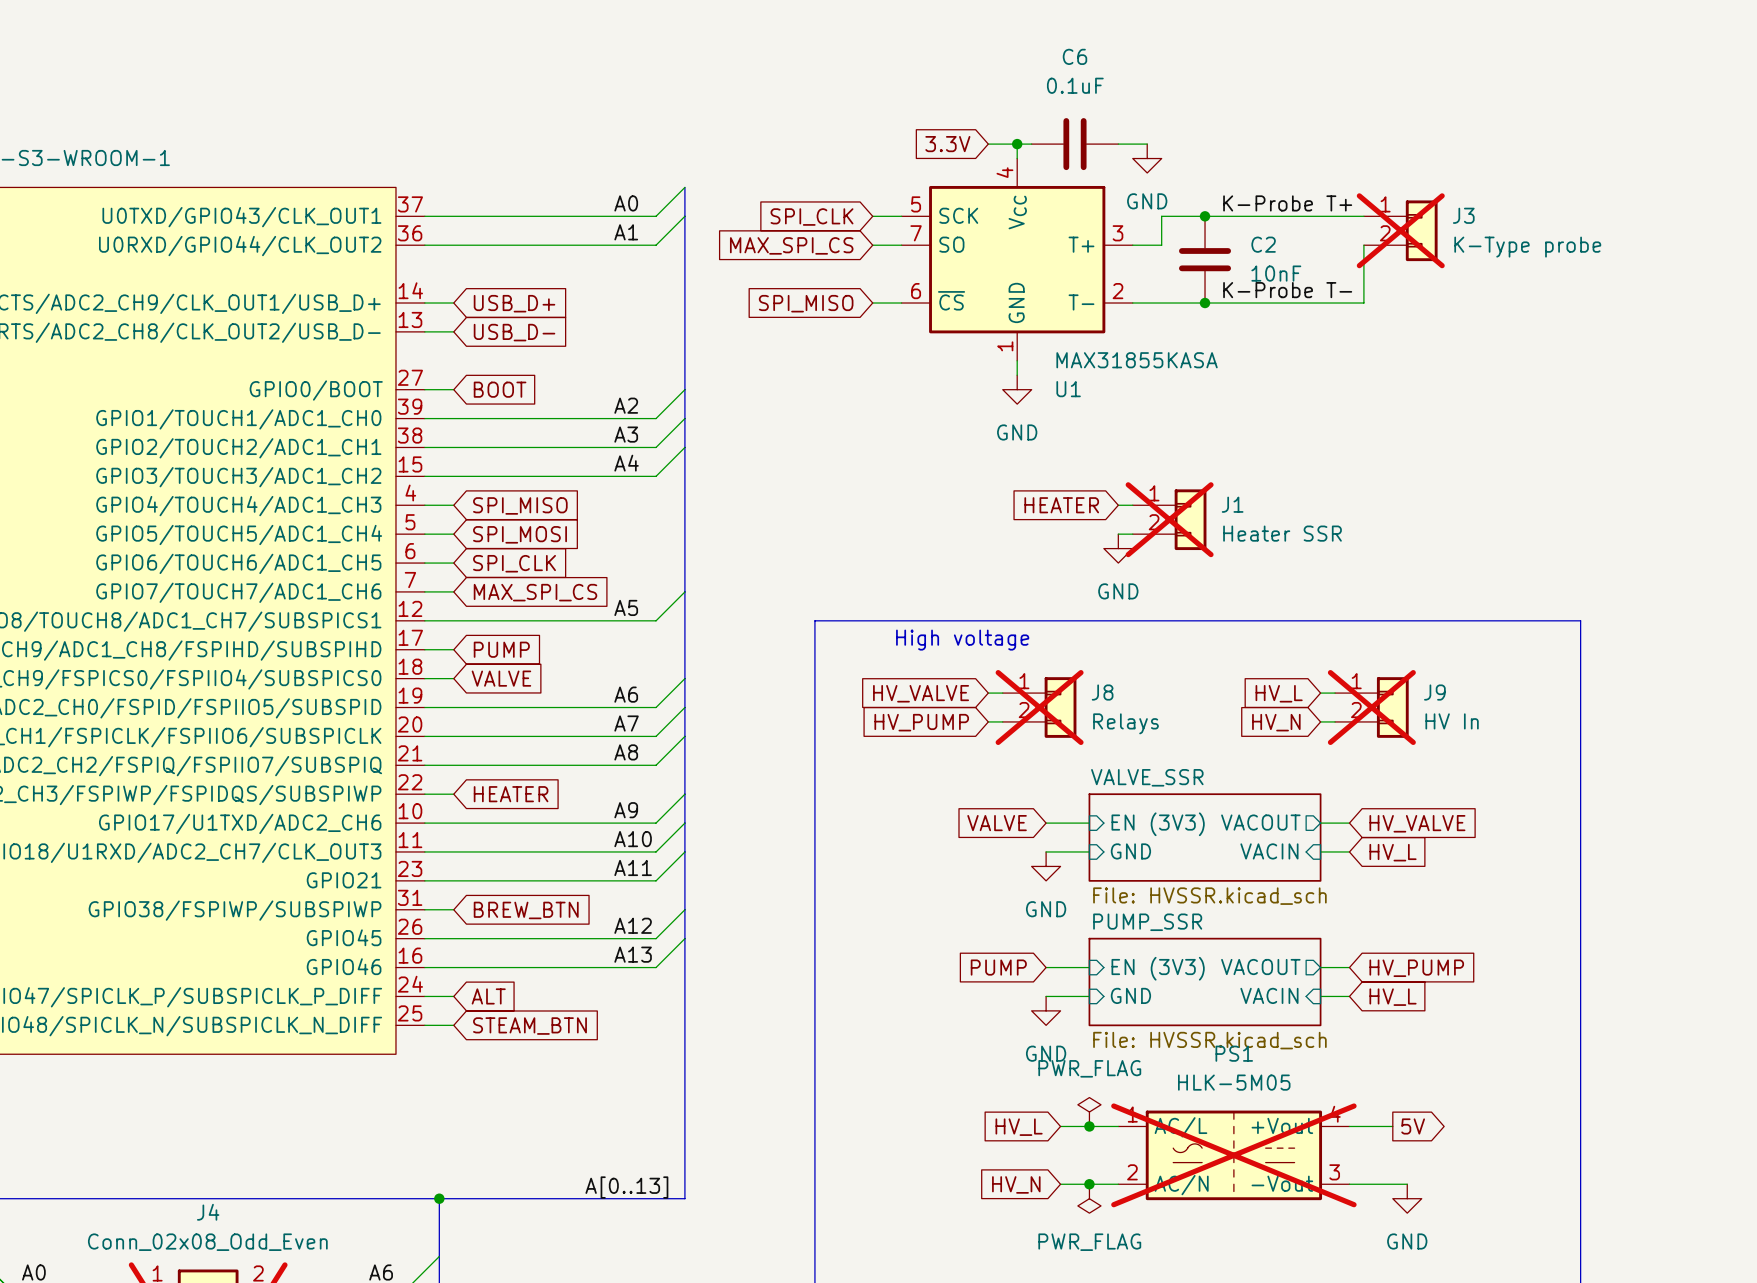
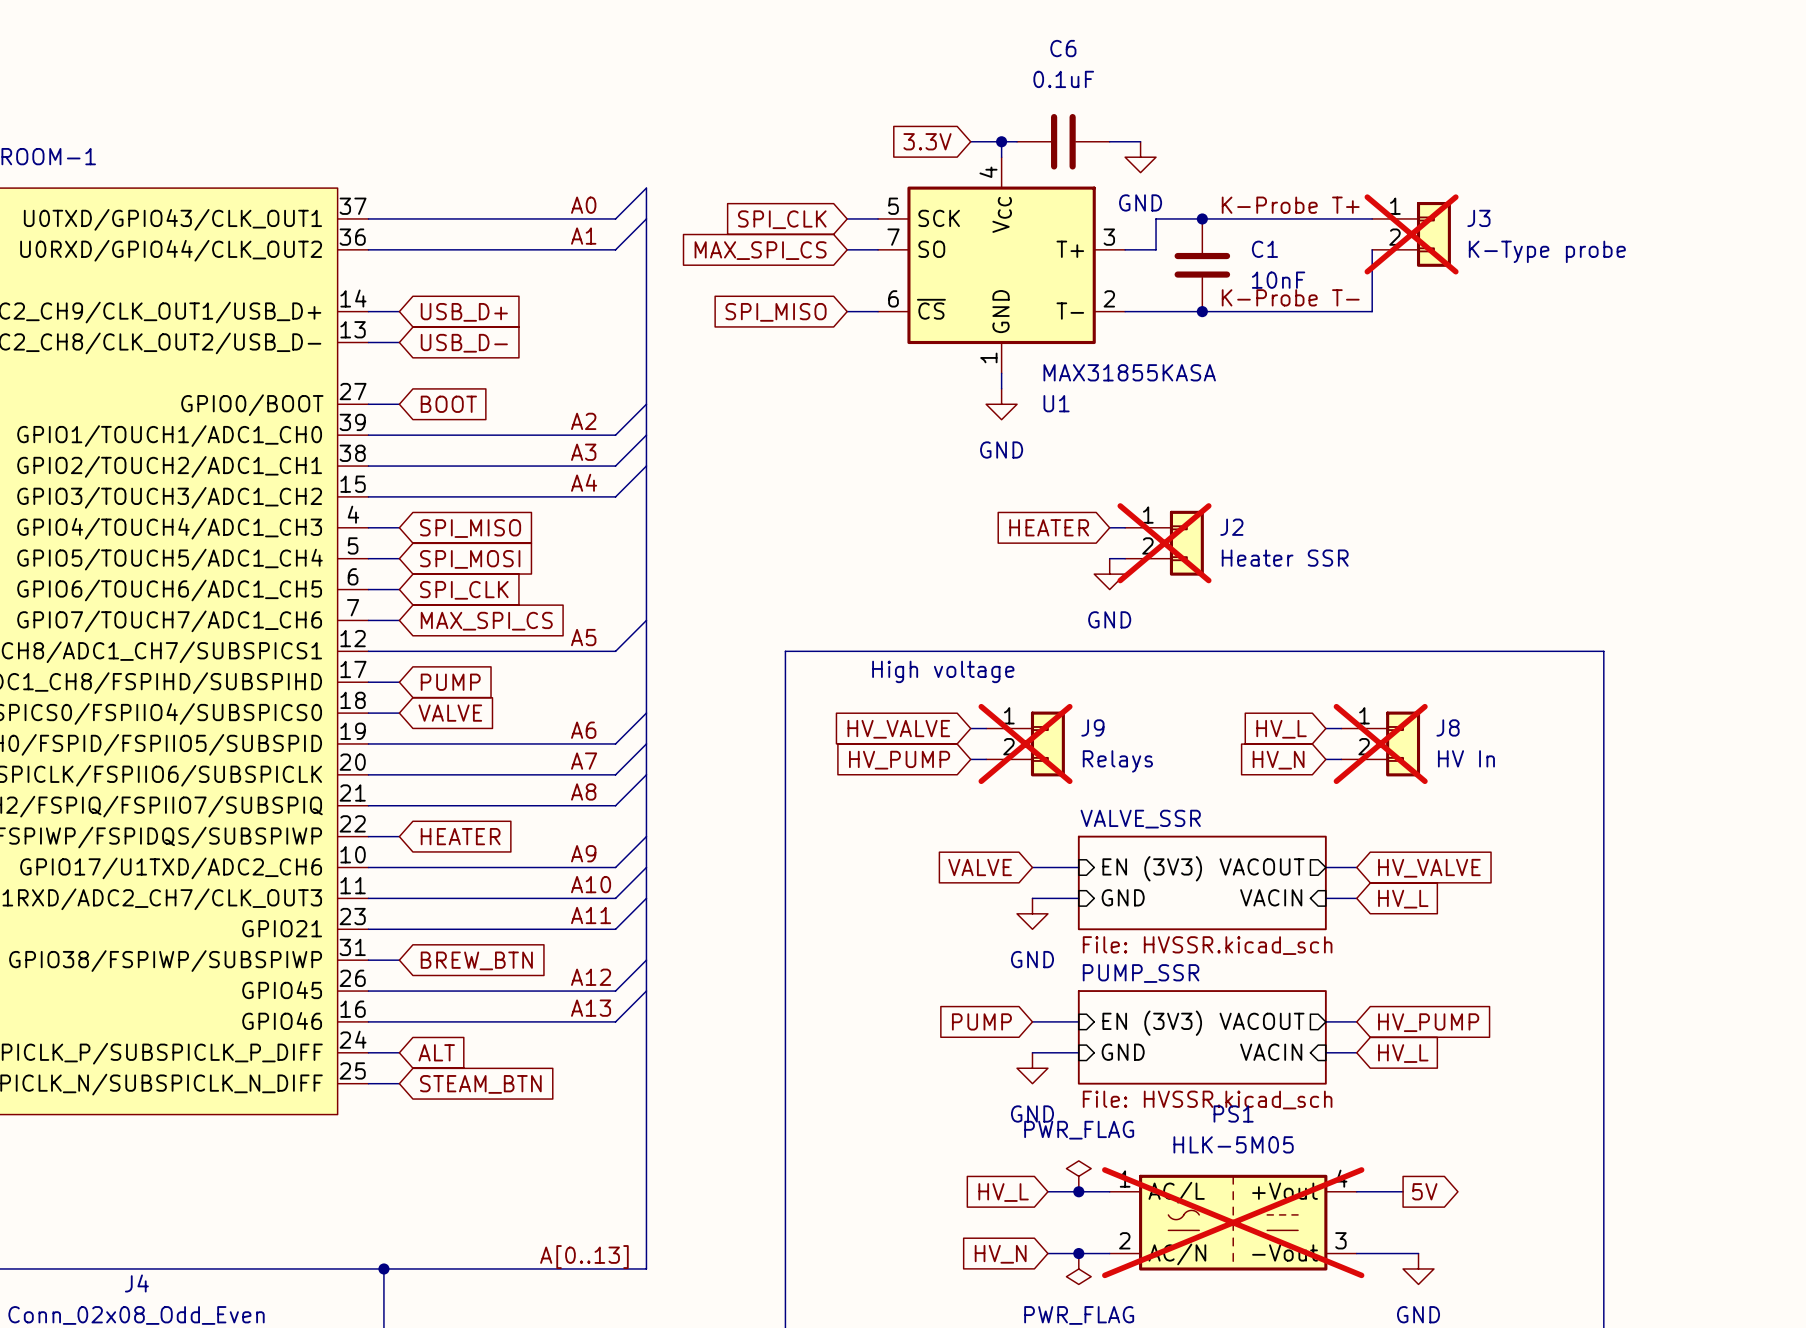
C2 name: C2 (1263, 244) -> C1 (1264, 249)
J1 name: J1 (1232, 504) -> J2 (1231, 527)
J8 name: J8 (1102, 692) -> J9 (1092, 727)
J9 name: J9 (1434, 692) -> J8 (1448, 727)

